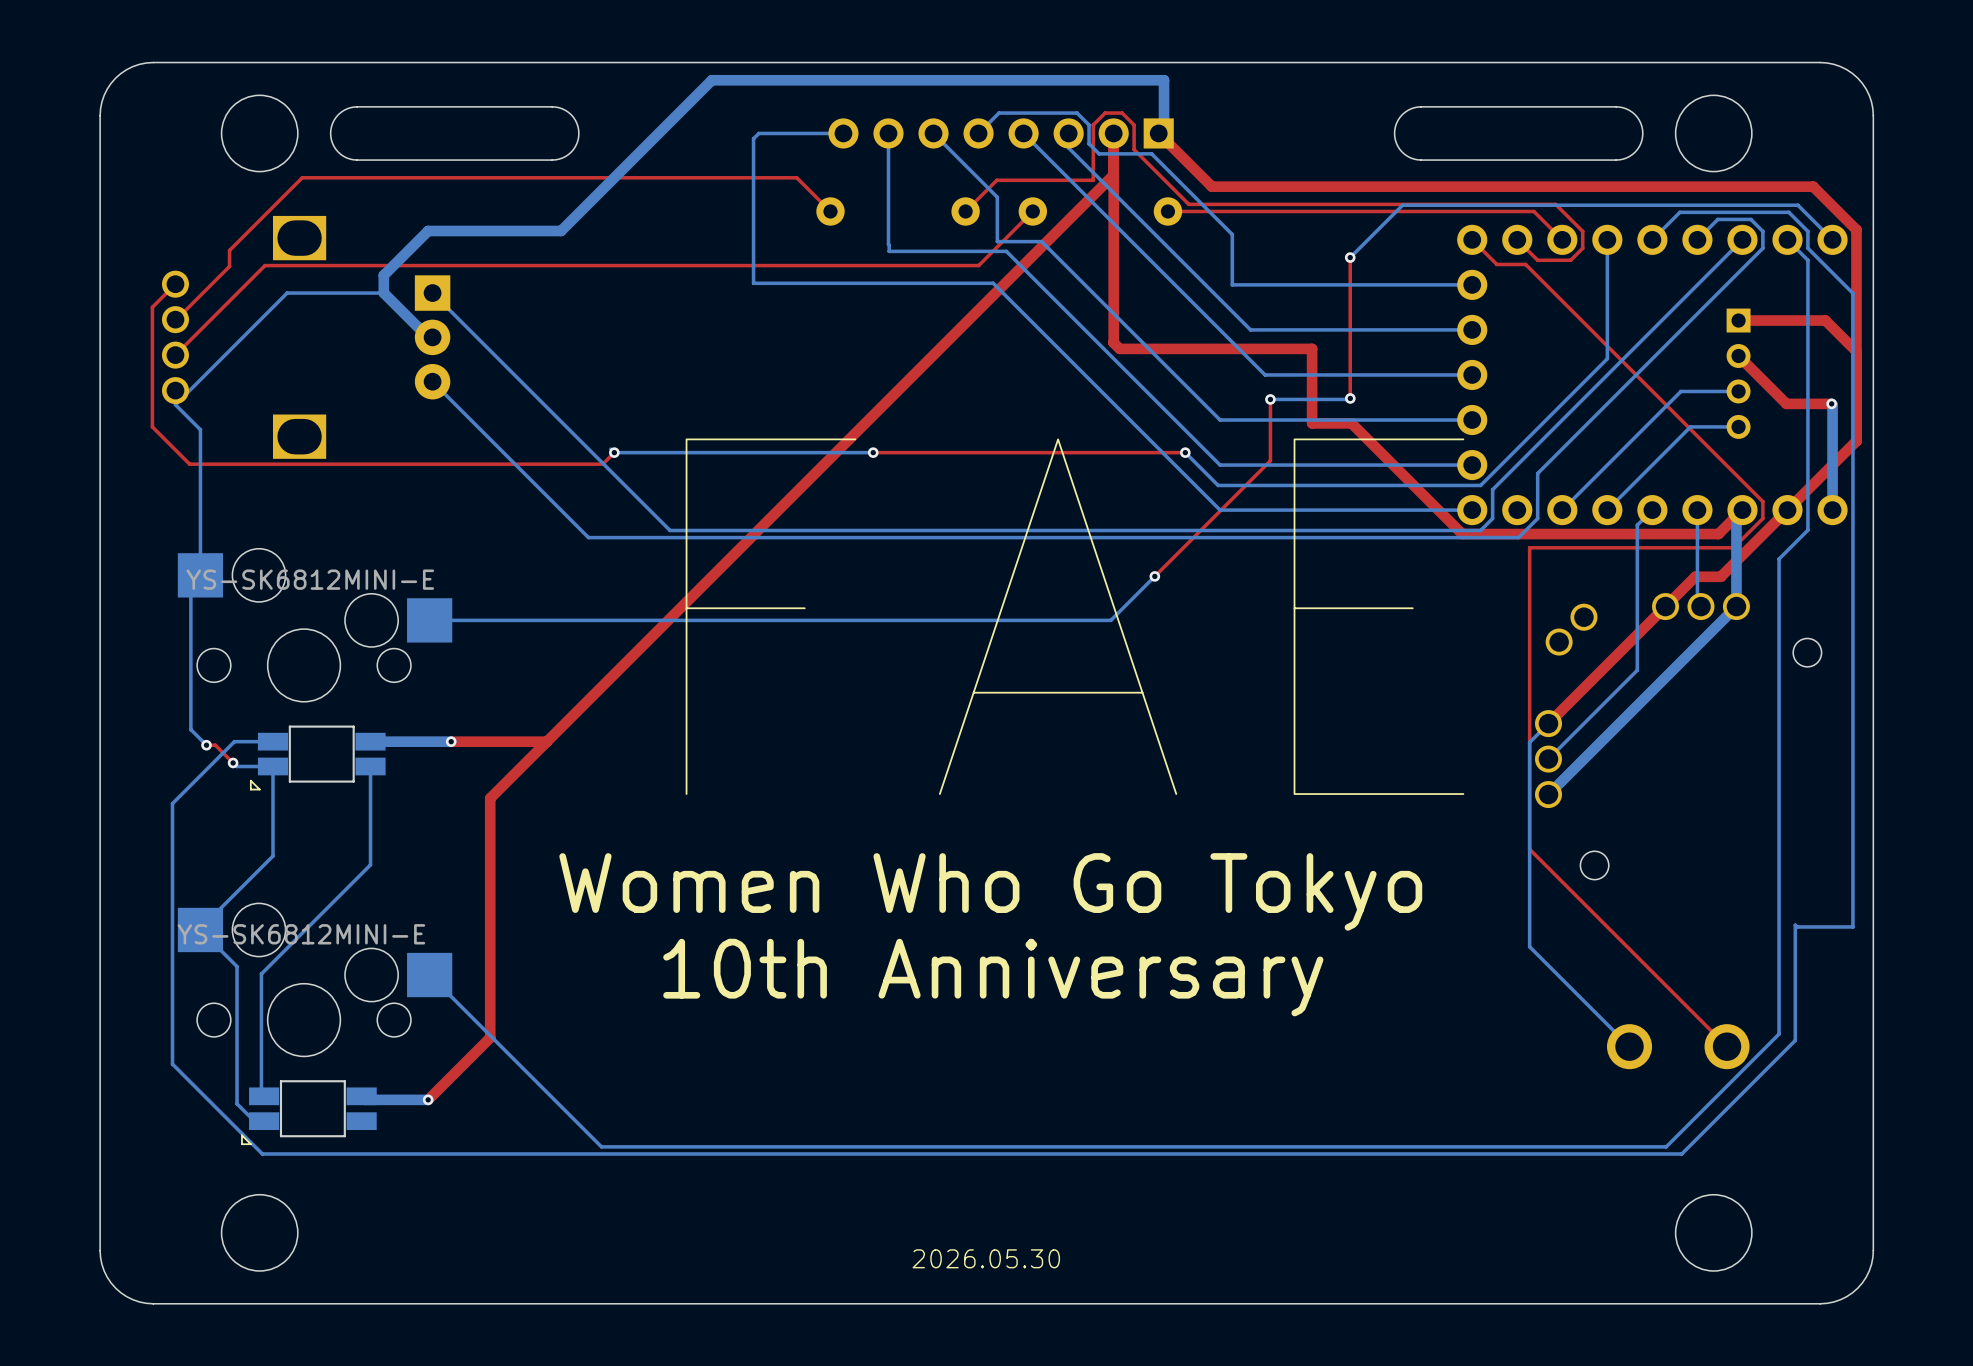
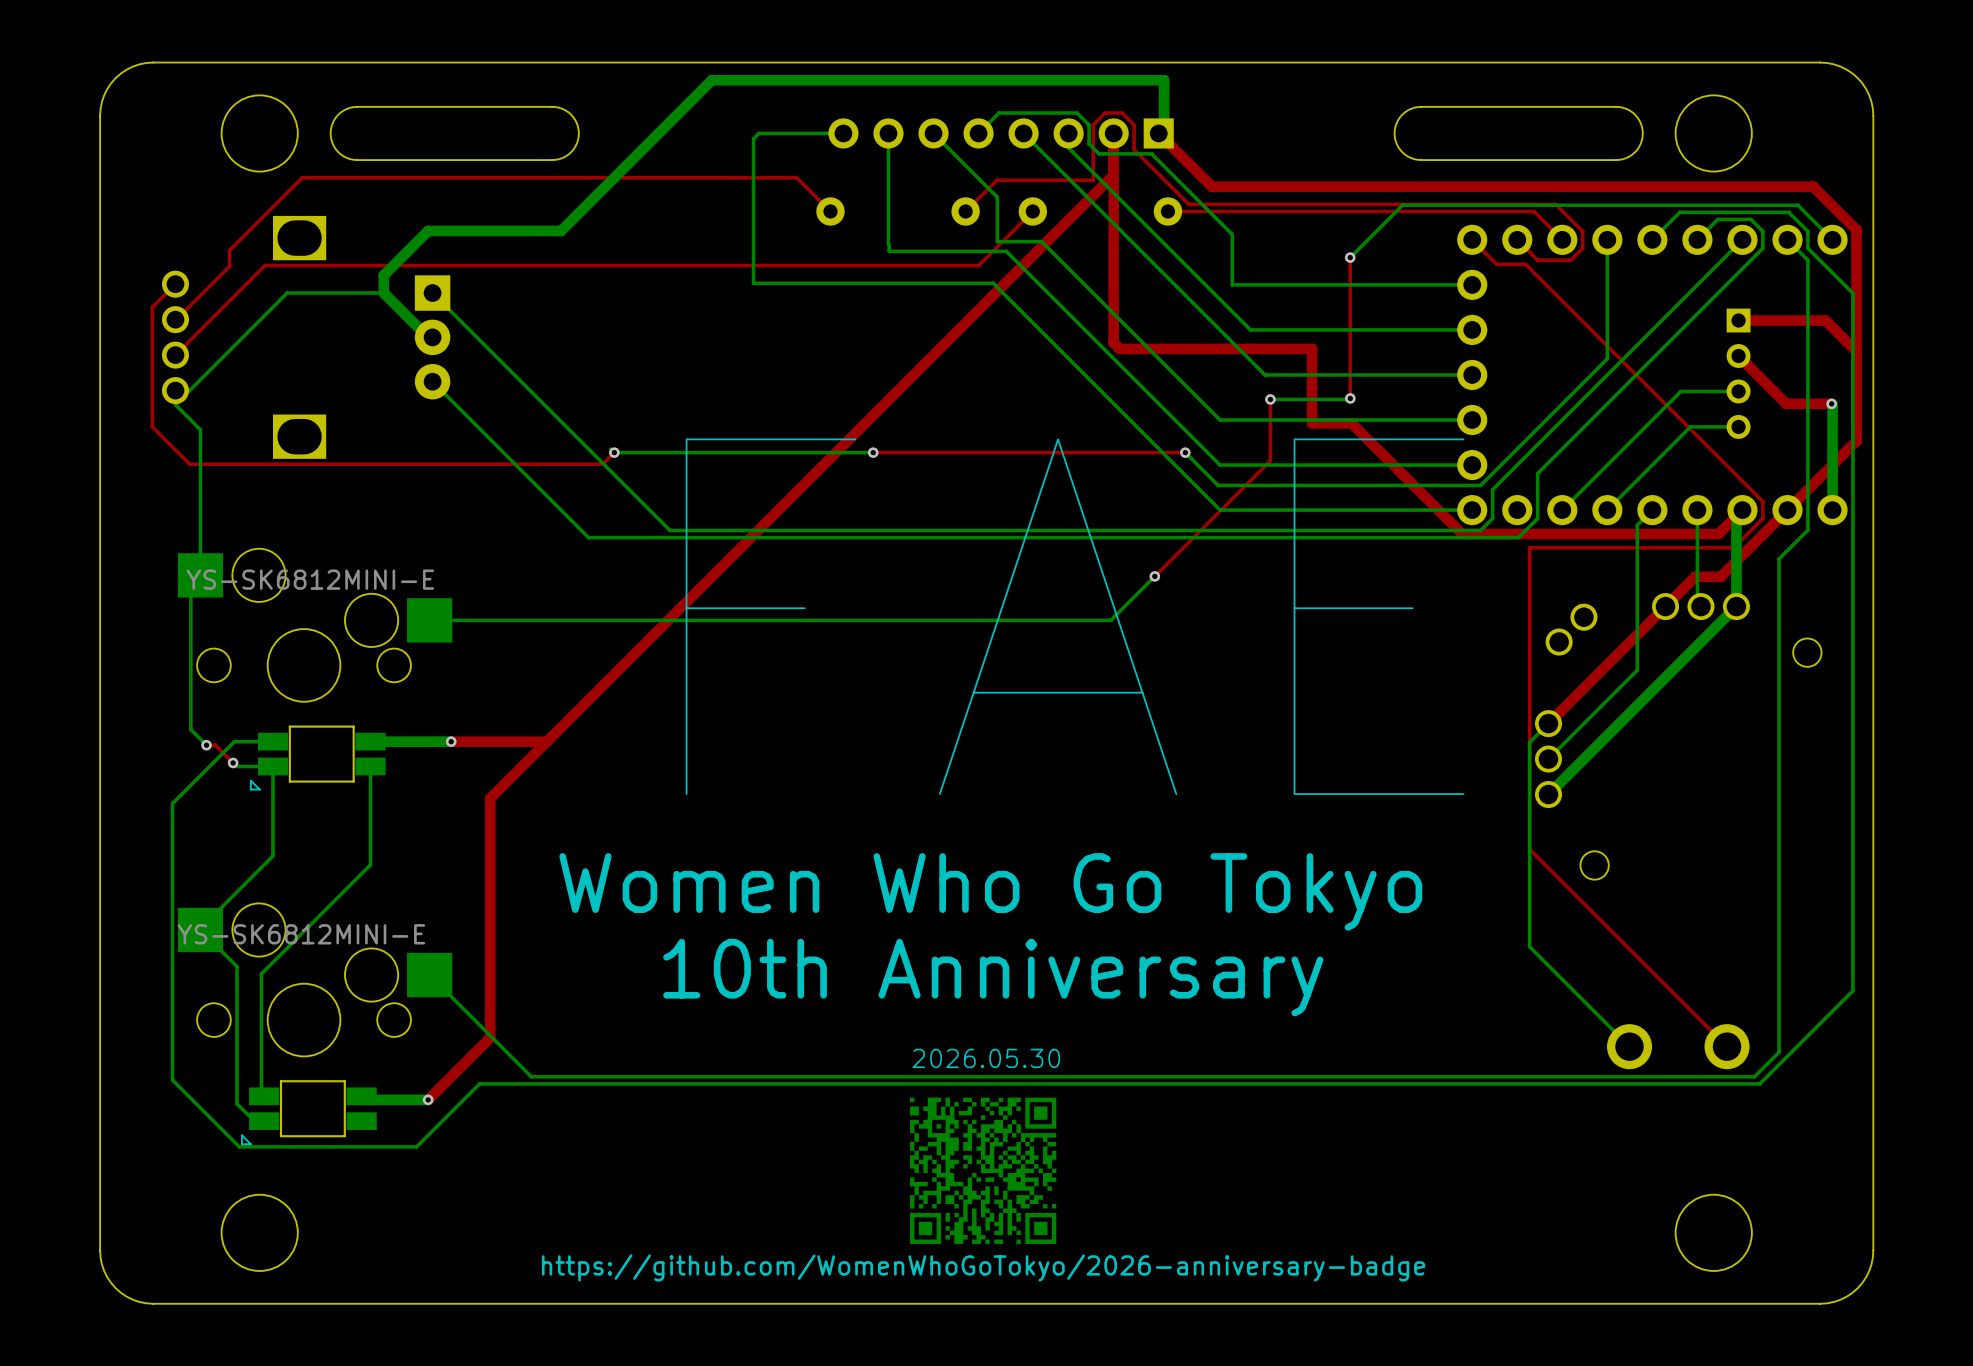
bottom track: (1852, 926) (1797, 926) (1795, 925) (1795, 1040) (1681, 1153) (262, 1153) (172, 1064) -> (1852, 926) (1852, 990) (1759, 1083) (479, 1083) (416, 1146) (239, 1146) (172, 1080) (172, 1064)
bottom track: (1779, 1034) (1666, 1146) (601, 1146) (531, 1076) -> (1779, 1034) (1779, 1052) (1754, 1076) (531, 1076)
part: none -> https://github.com/WomenWhoGoTokyo/2026-anniversary-badge (983, 1170)
text position: 2026.05.30 (986, 1258) -> 2026.05.30 (986, 1058)

